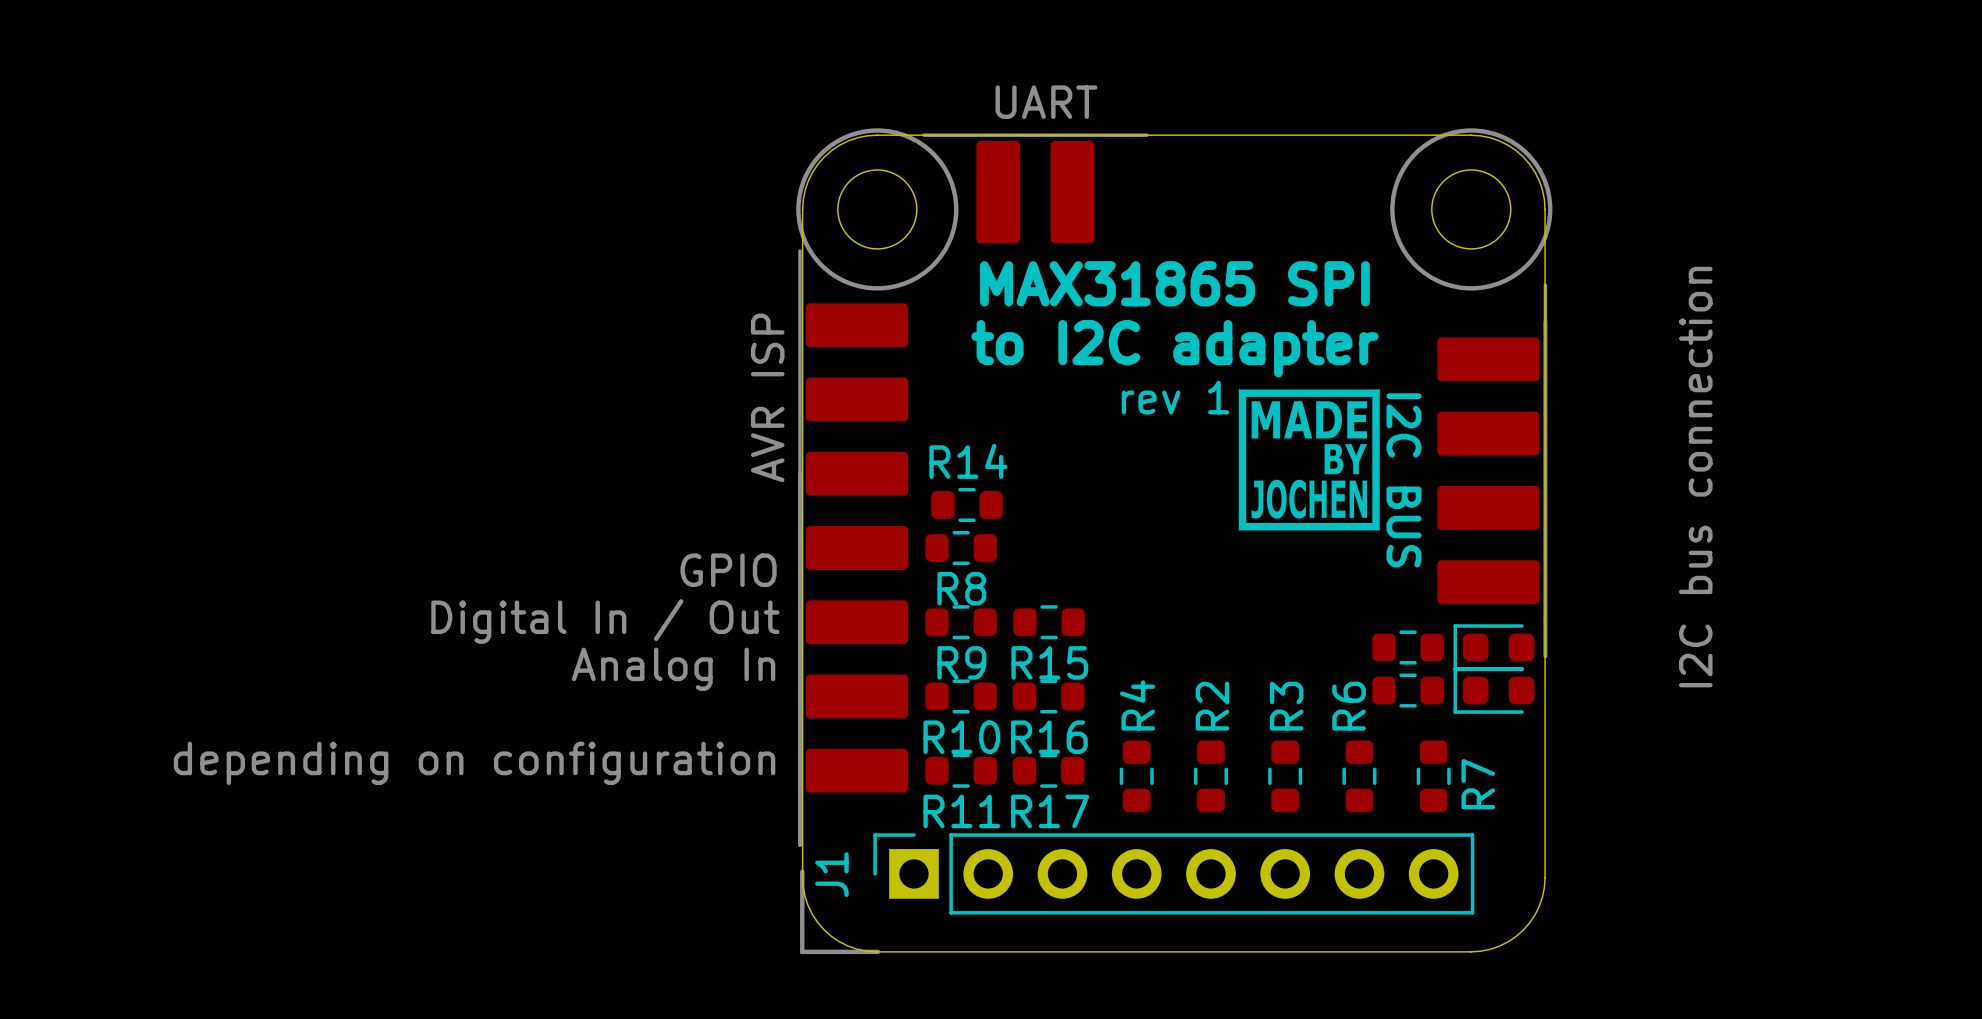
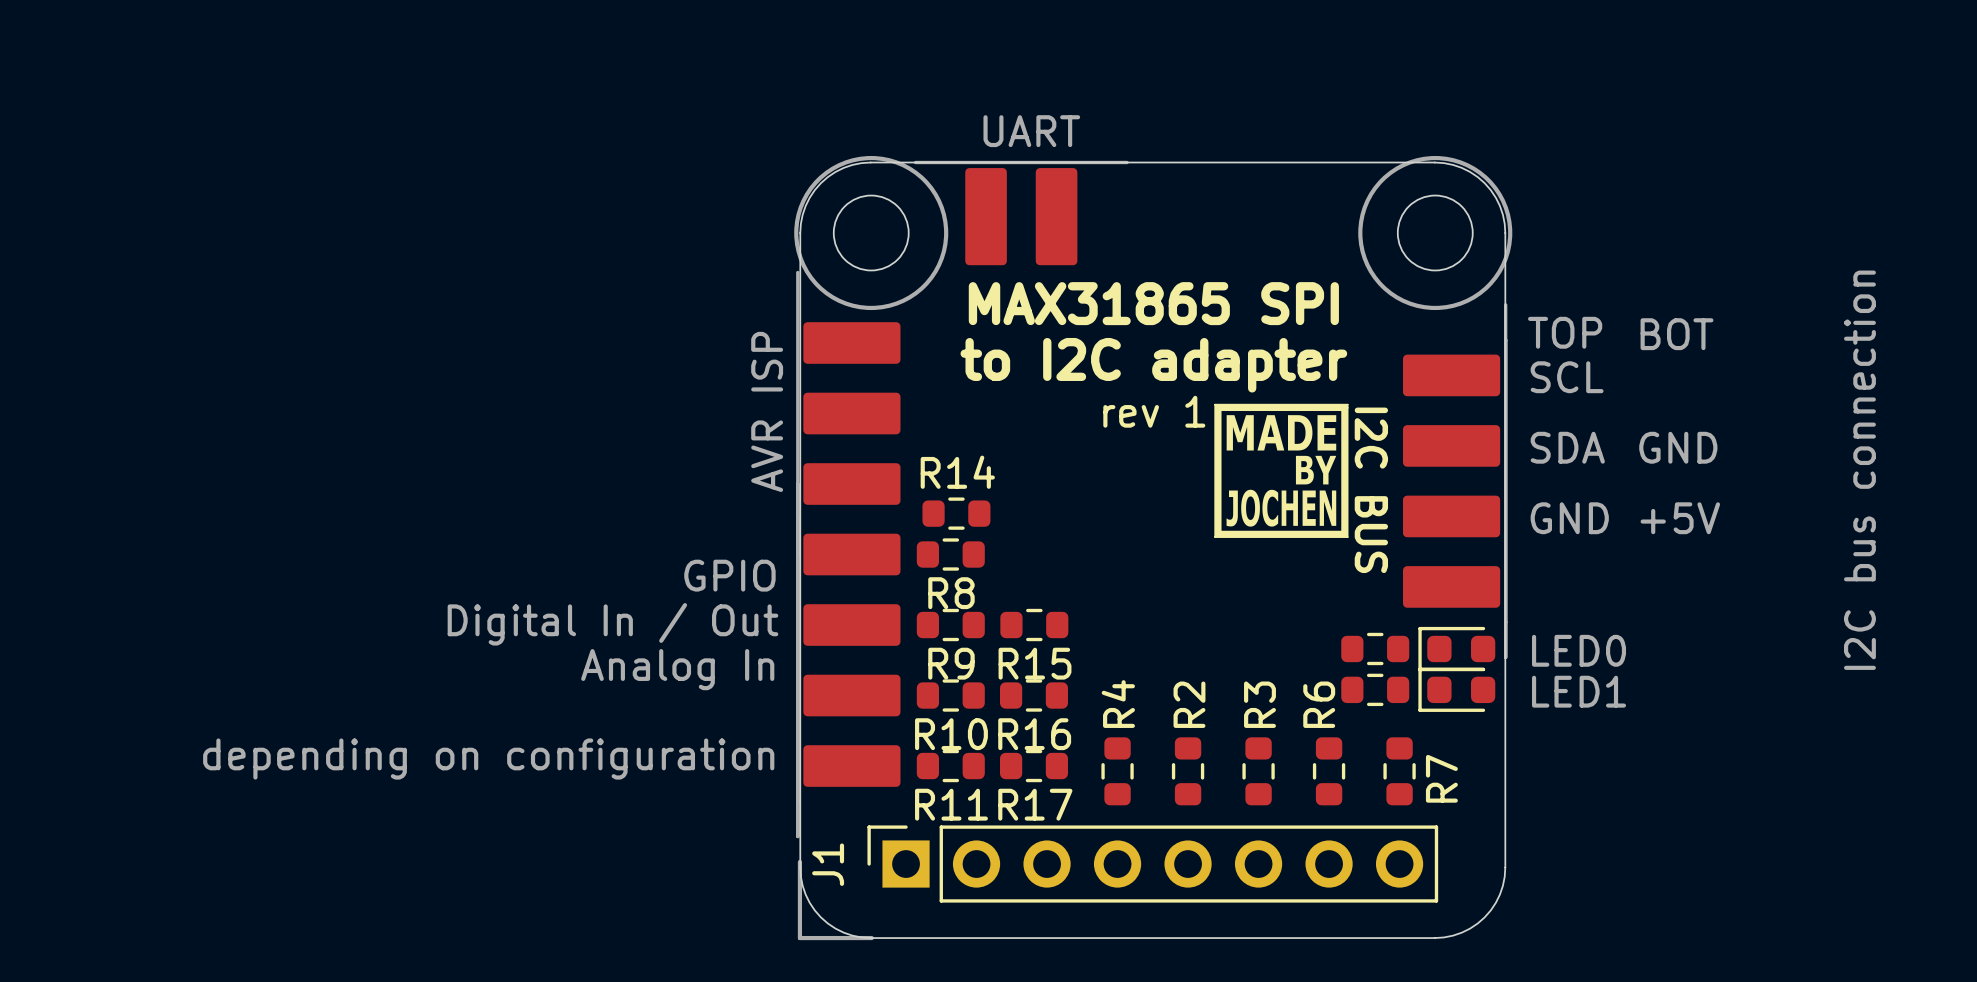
text: none -> TOP (1565, 332)
text: none -> BOT (1677, 334)
text: none -> SCL (1567, 377)
text: none -> SDA (1567, 447)
text: none -> GND (1678, 447)
text position: I2C bus connection (1695, 477) -> I2C bus connection (1859, 470)
text: none -> GND (1569, 518)
text: none -> +5V (1680, 518)
text: none -> LED0 (1579, 650)
text: none -> LED1 (1579, 691)

